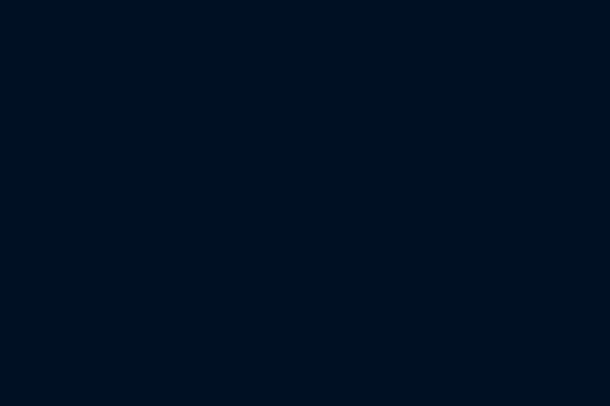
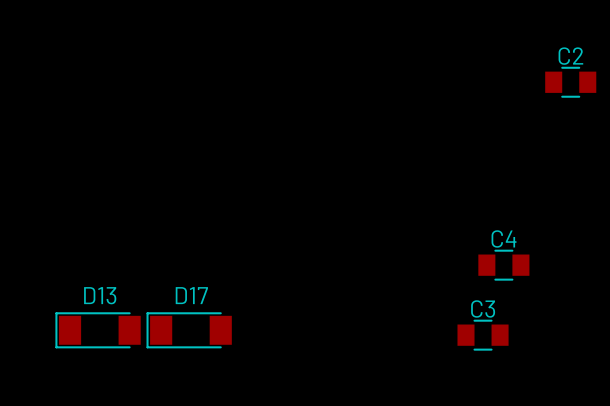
C2: none -> (570, 82)
C4: none -> (503, 265)
D13: none -> (98, 330)
D17: none -> (189, 330)
C3: none -> (483, 335)

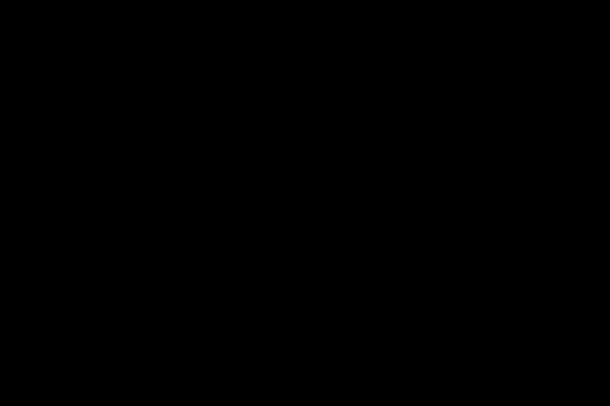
C2: (570, 82) -> none
C4: (503, 265) -> none
D13: (98, 330) -> none
D17: (189, 330) -> none
C3: (483, 335) -> none

